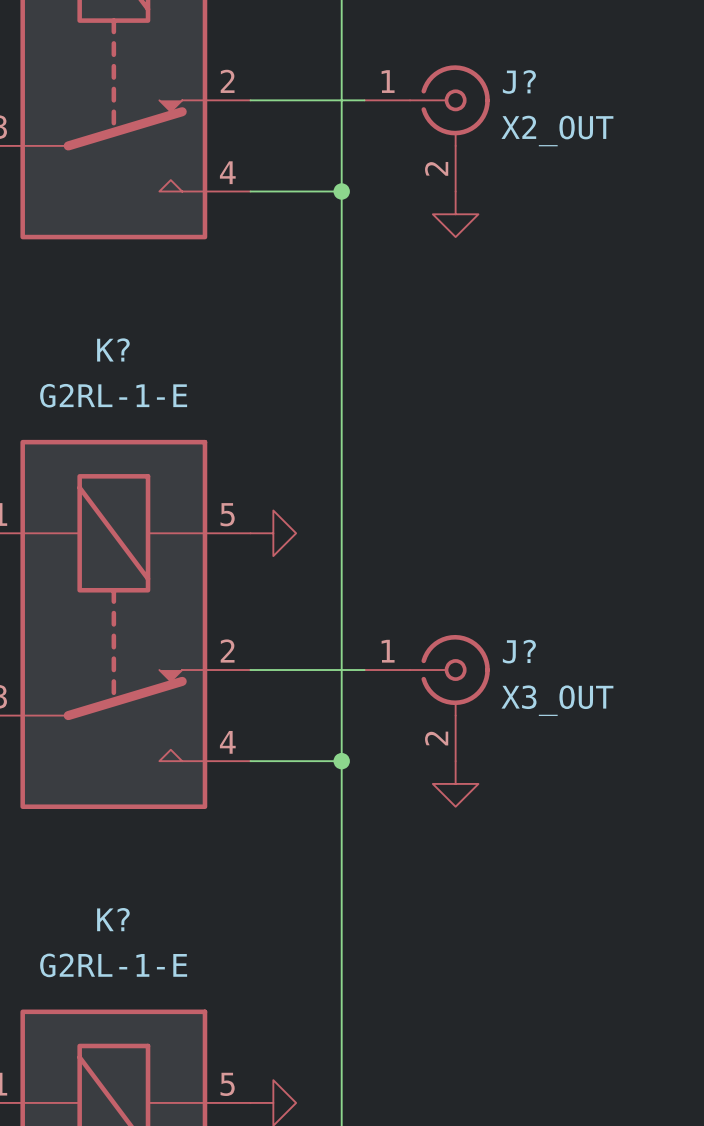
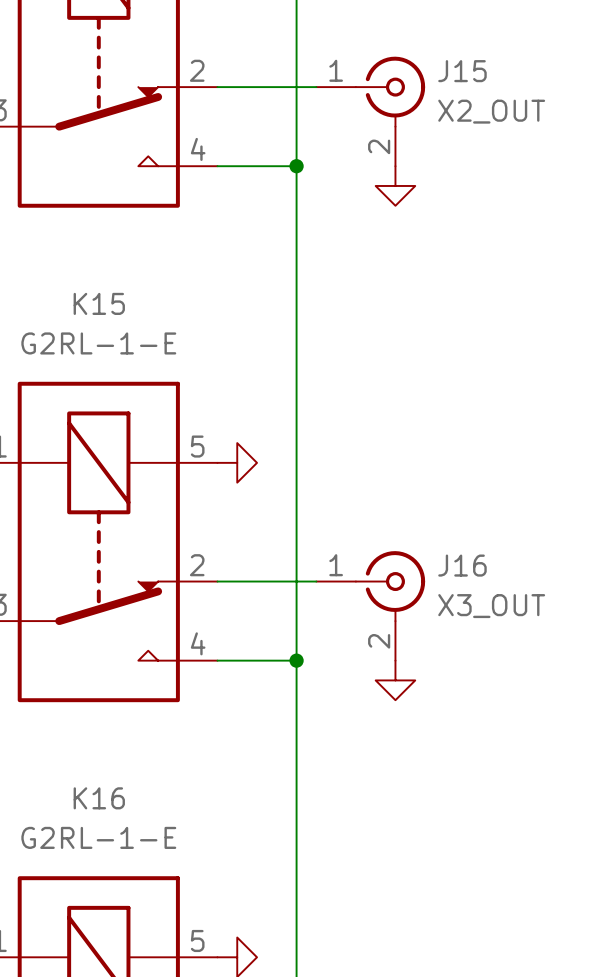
J? name: J? (519, 81) -> J15 (462, 71)
K? name: K? (113, 349) -> K15 (99, 303)
J? name: J? (519, 651) -> J16 (462, 565)
K? name: K? (113, 919) -> K16 (99, 798)

